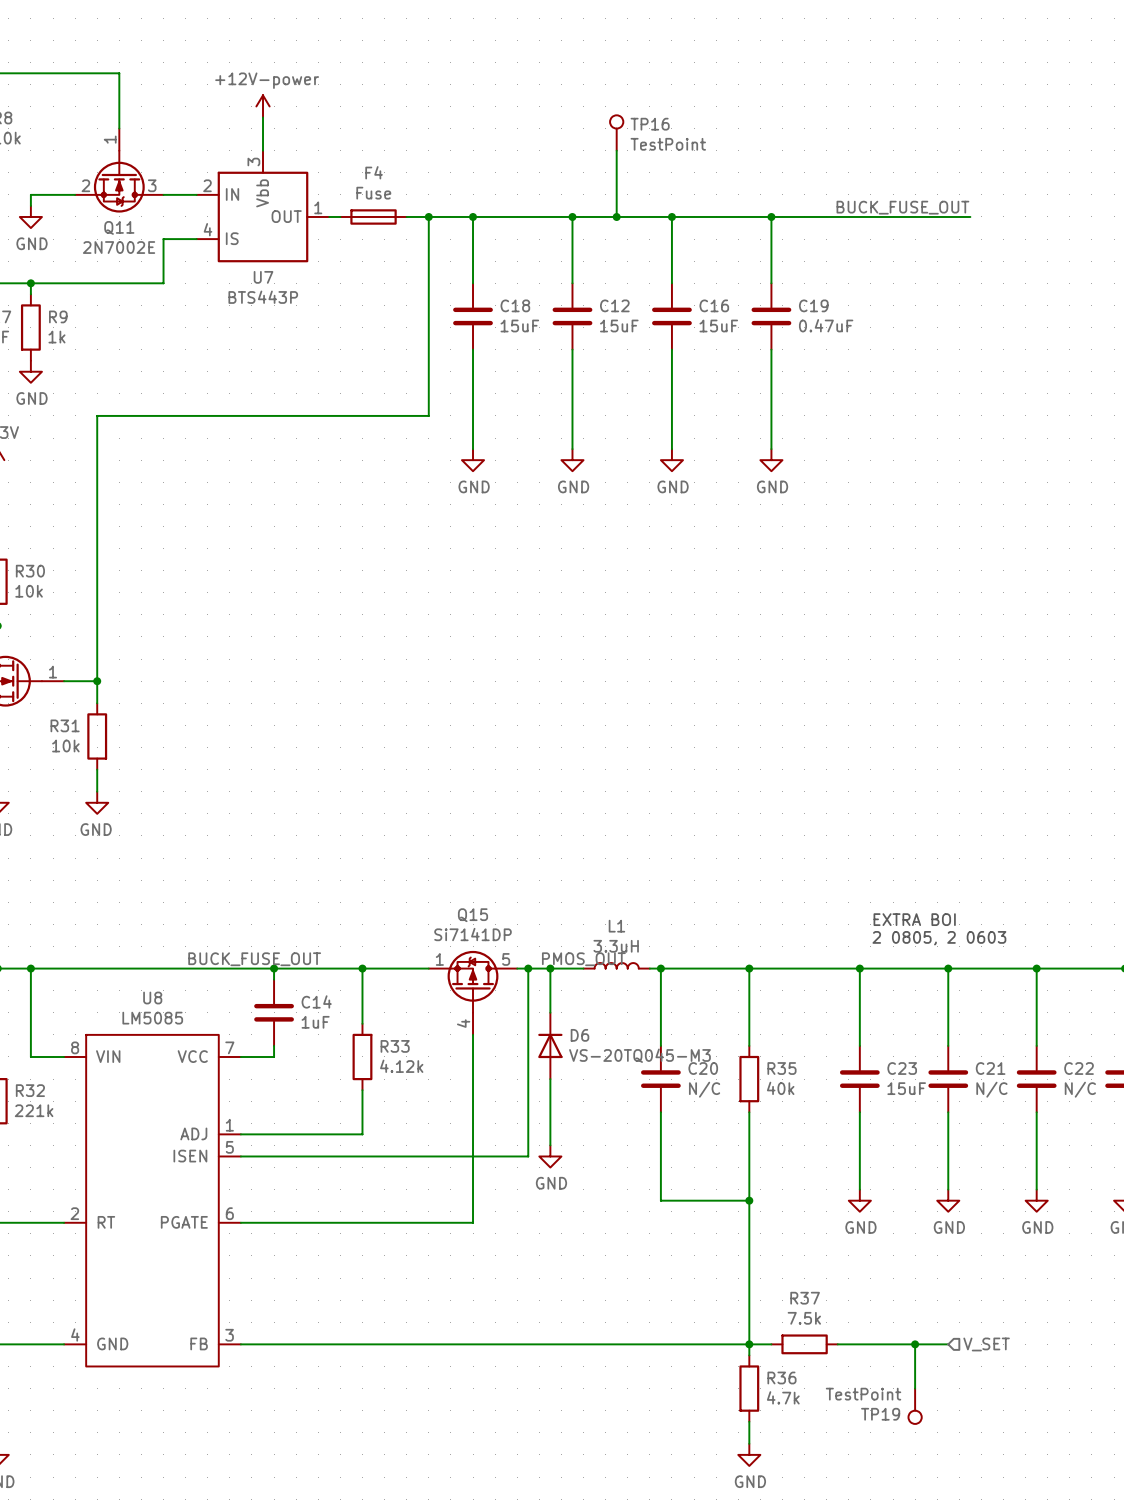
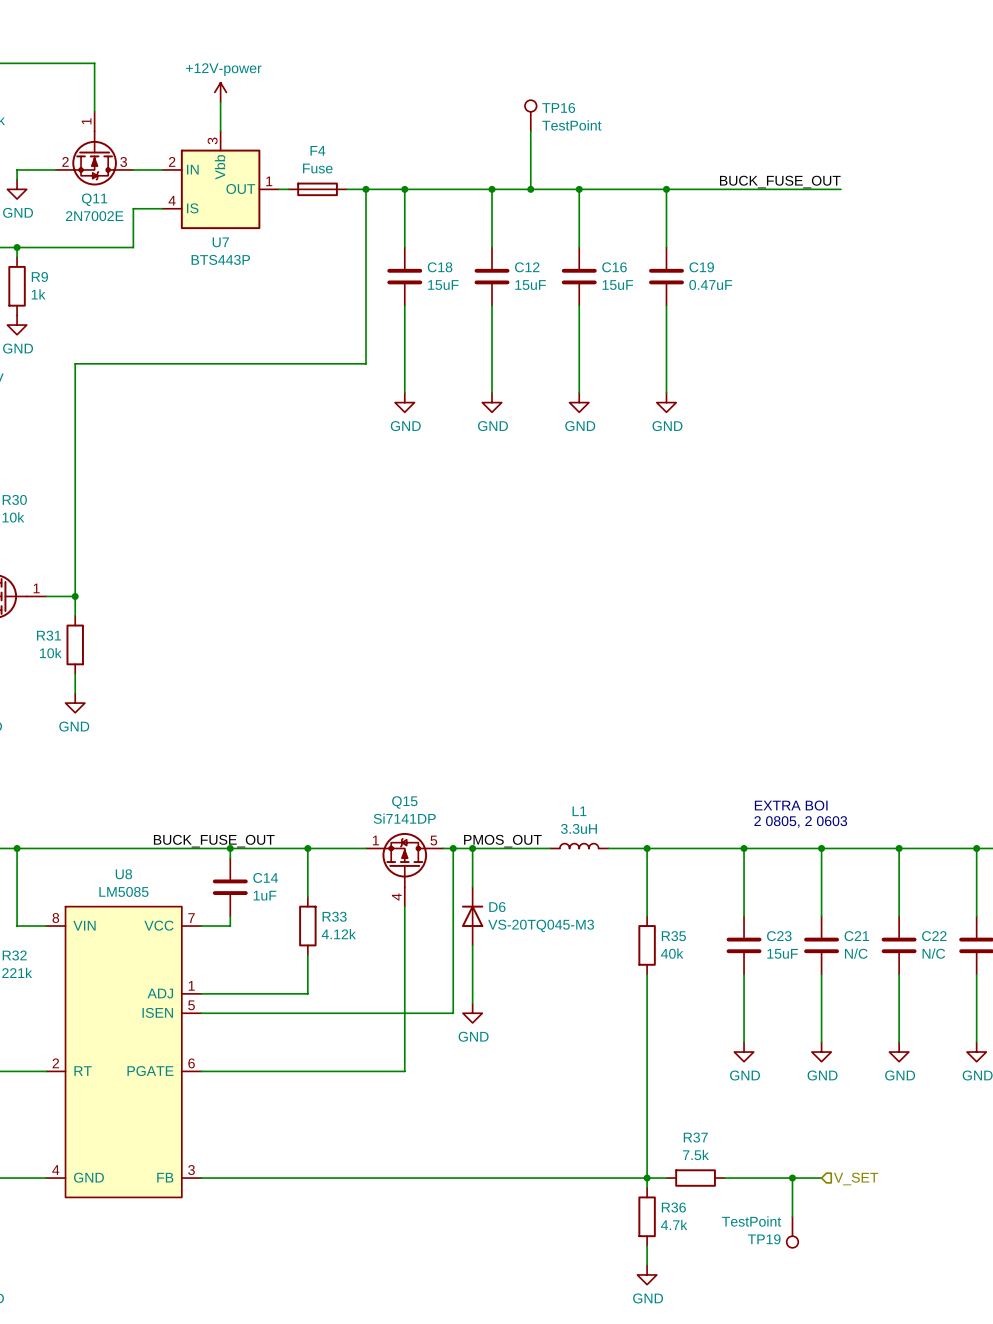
L1 position: (616, 965) -> (579, 846)
wire: (649, 968) (705, 968) -> (501, 848) (550, 848)
wire: (660, 968) (660, 1045) -> none
junction: (660, 968) -> none
C20: N/C (660, 1079) -> none
wire: (660, 1112) (660, 1200) (749, 1200) -> none
junction: (749, 1200) -> none

